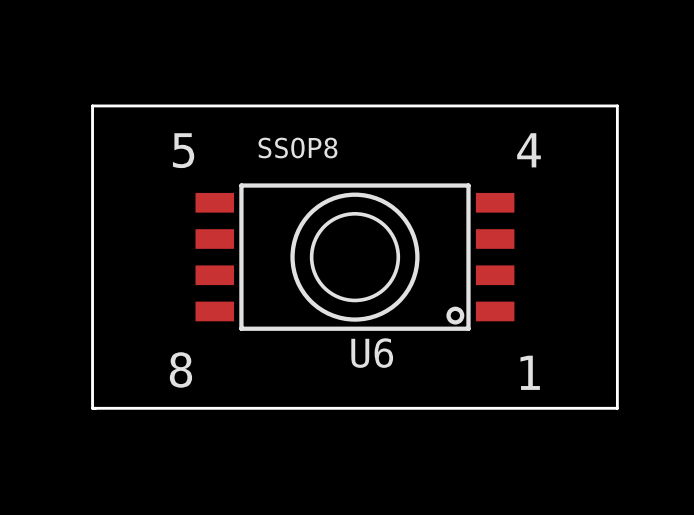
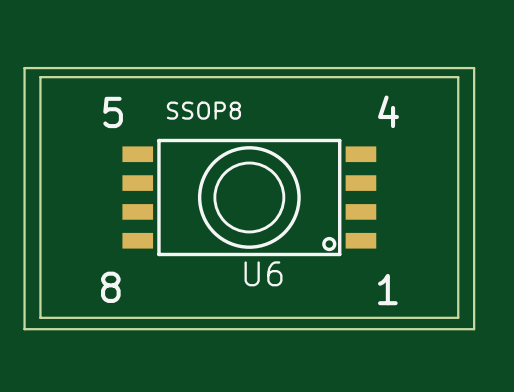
board edge: none -> (24, 68) (24, 329) (474, 329) (474, 68) (24, 68)

